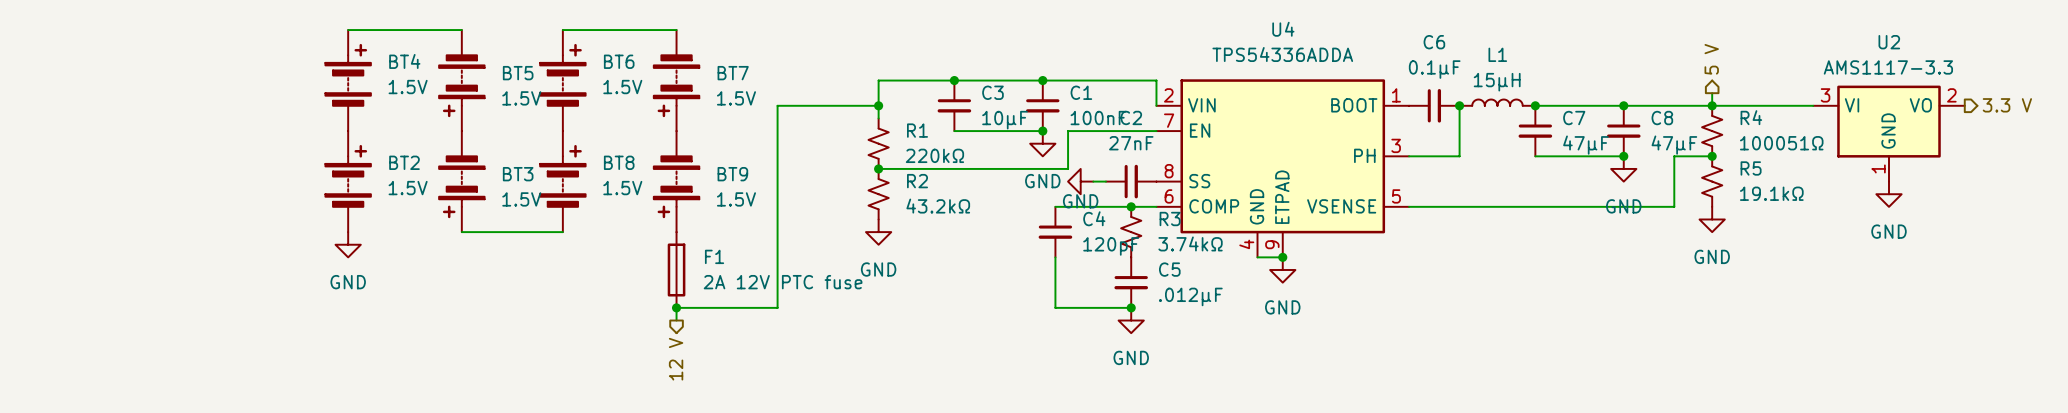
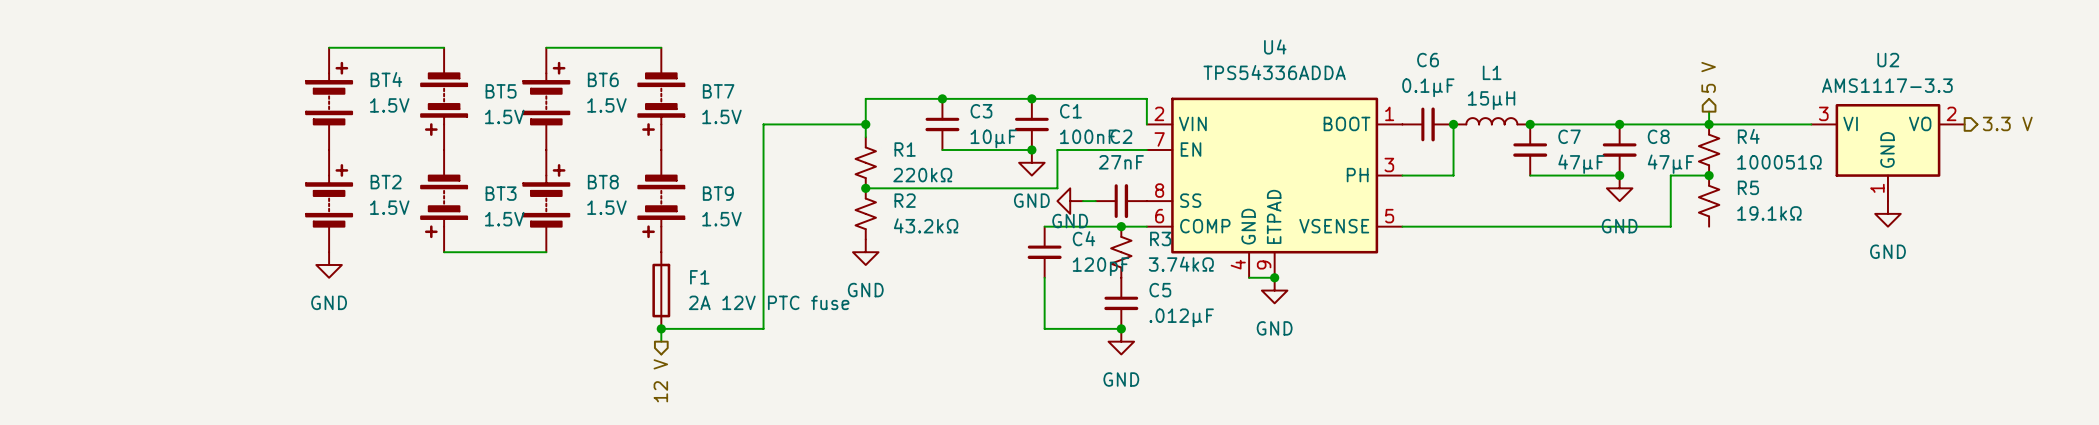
power symbol: GND (1712, 219) -> none

